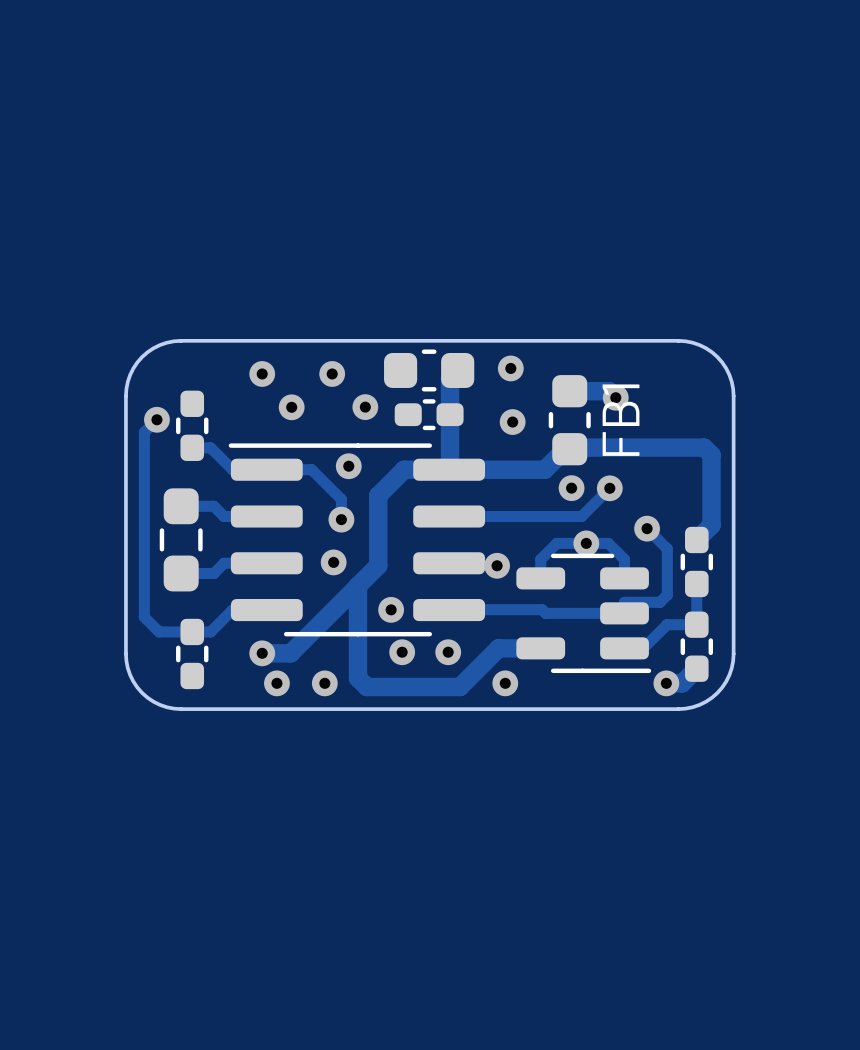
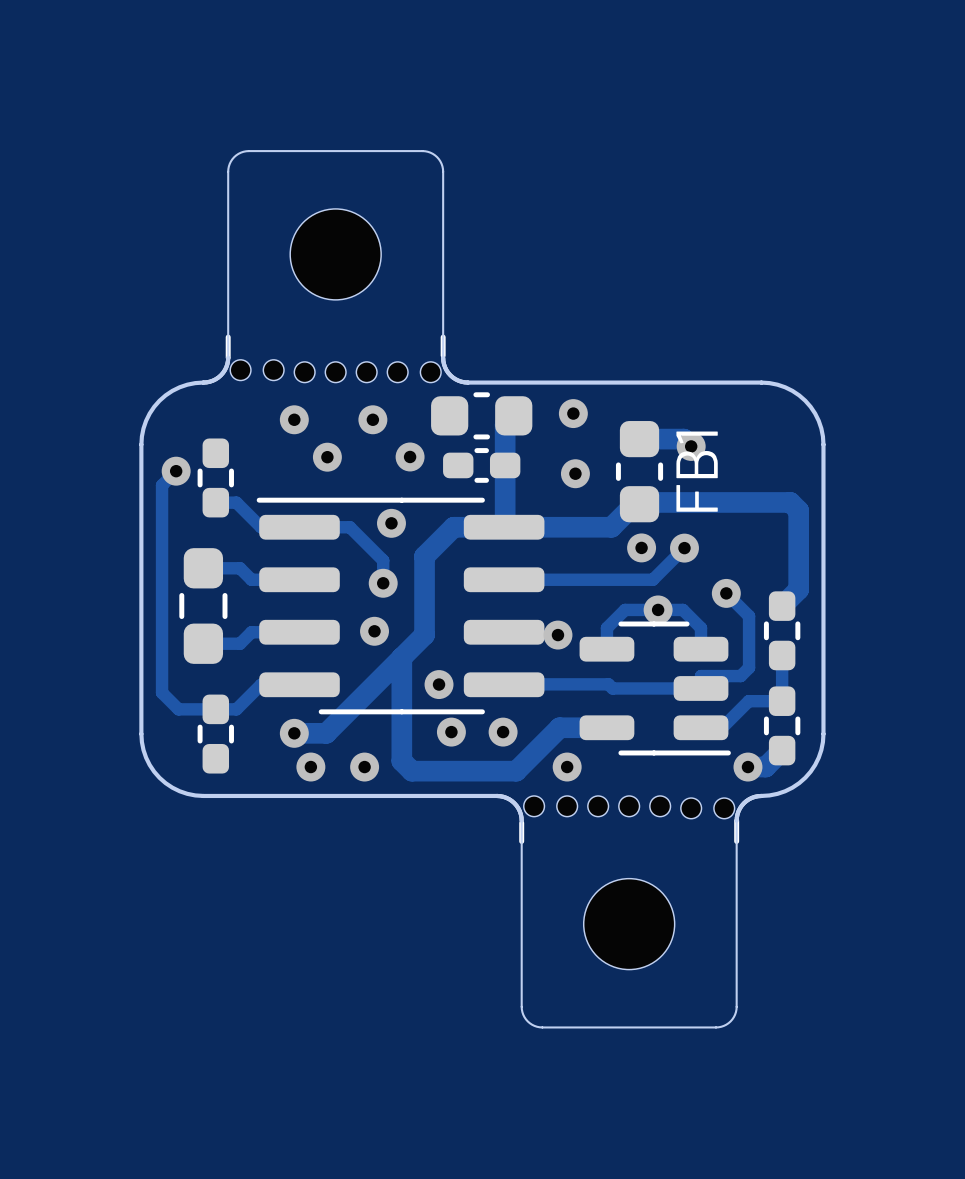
part: none -> (335, 254)
part: none -> (335, 359)
board edge: (181, 340) (416, 340) -> (203, 382) (218, 377) (224, 370) (227, 361) (228, 169) (234, 157) (240, 152) (248, 151) (422, 151) (430, 152) (437, 157) (441, 163) (443, 171) (443, 361) (446, 370) (452, 377) (467, 382)
board edge: (442, 709) (678, 709) -> (496, 795) (511, 801) (518, 808) (521, 817) (521, 1009) (527, 1021) (534, 1025) (542, 1027) (715, 1027) (723, 1025) (730, 1021) (735, 1014) (736, 1006) (736, 817) (739, 808) (746, 801) (761, 795)
part: none -> (629, 818)
part: none -> (629, 924)

